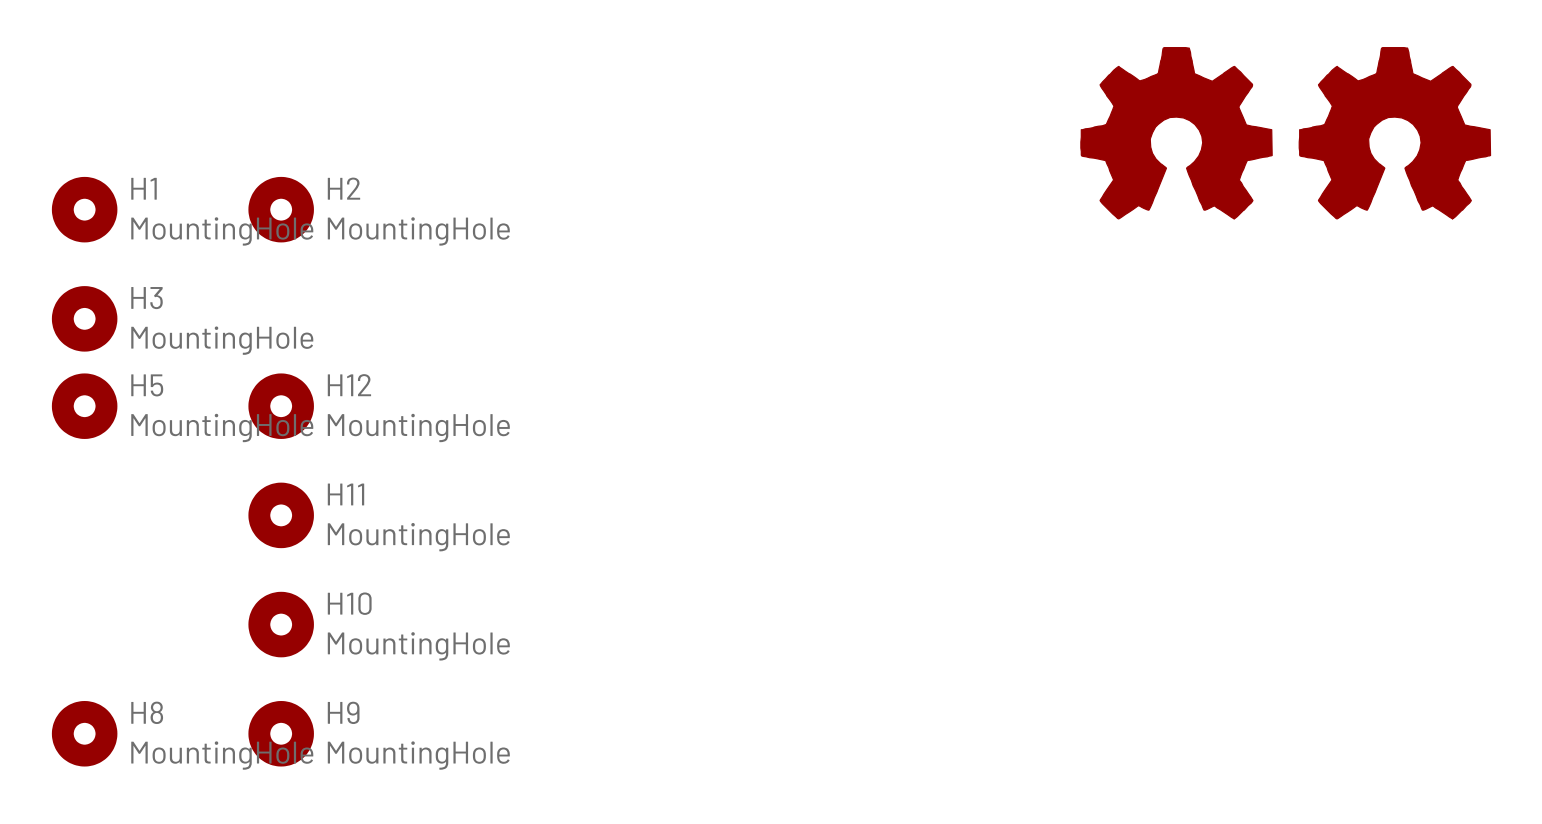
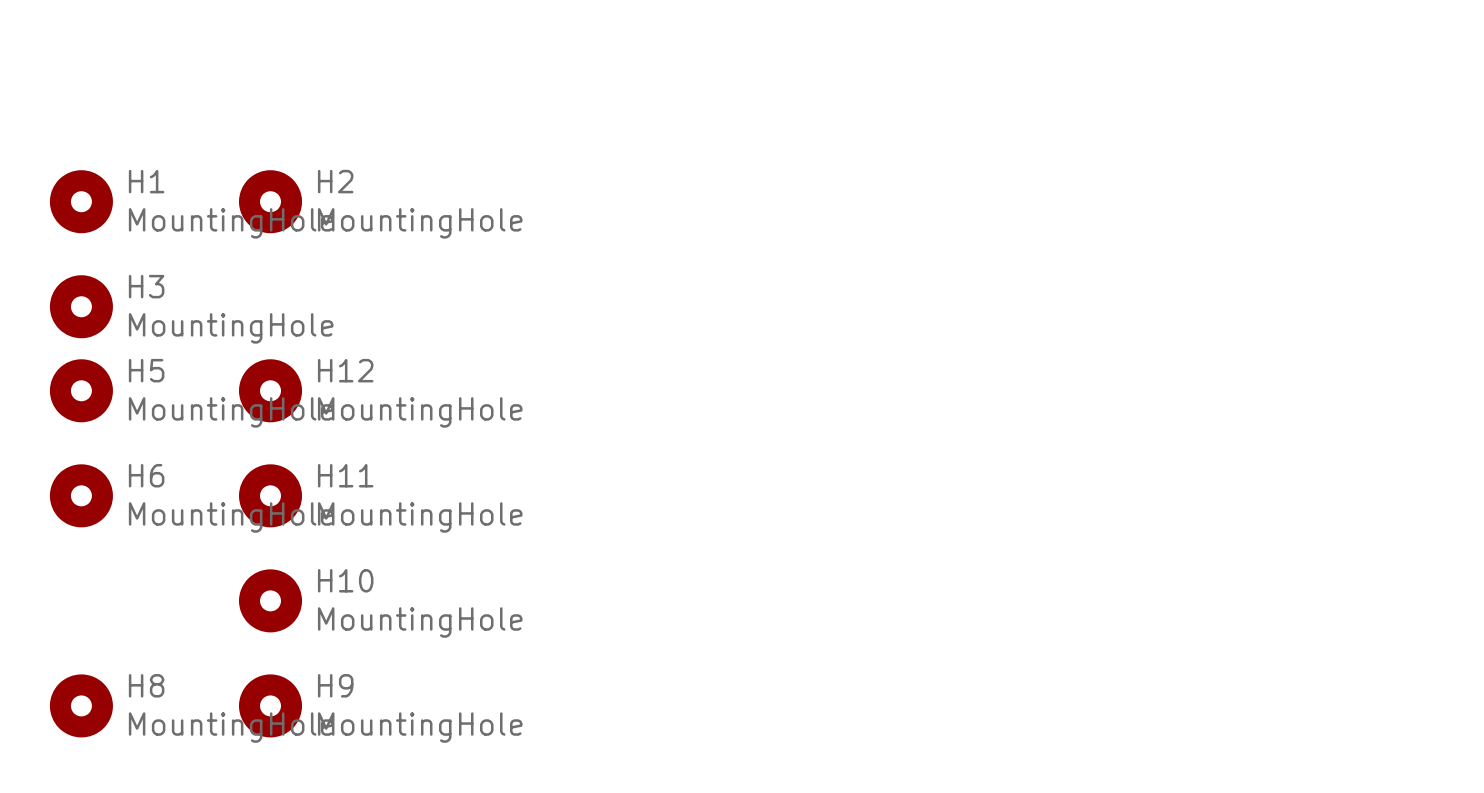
power symbol: (1176, 133) -> none
power symbol: (1394, 133) -> none
H6: none -> MountingHole (81, 495)

